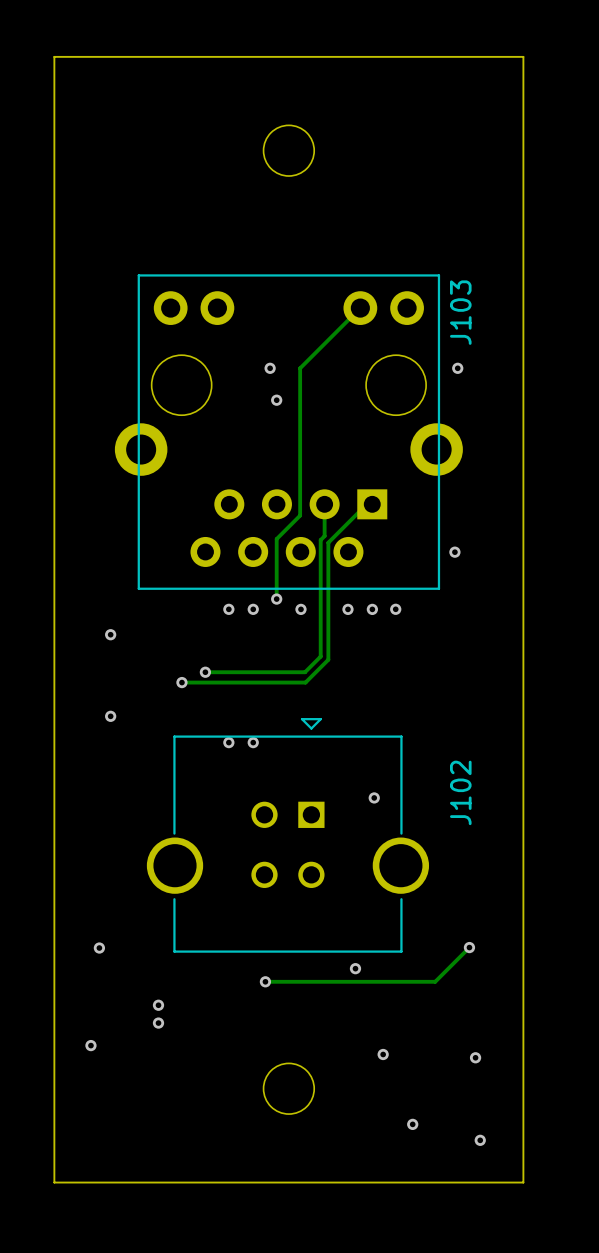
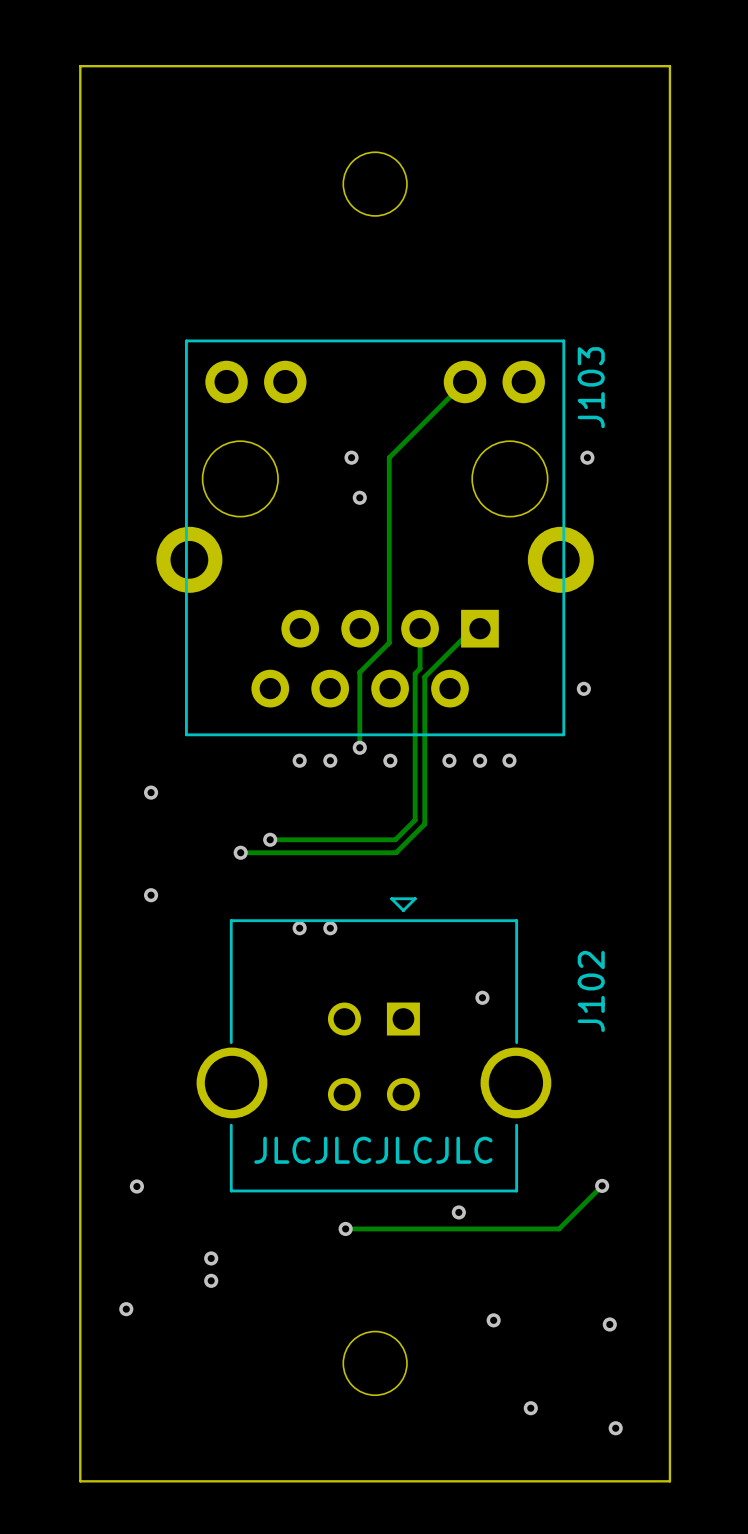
text: none -> JLCJLCJLCJLC (373, 1150)

